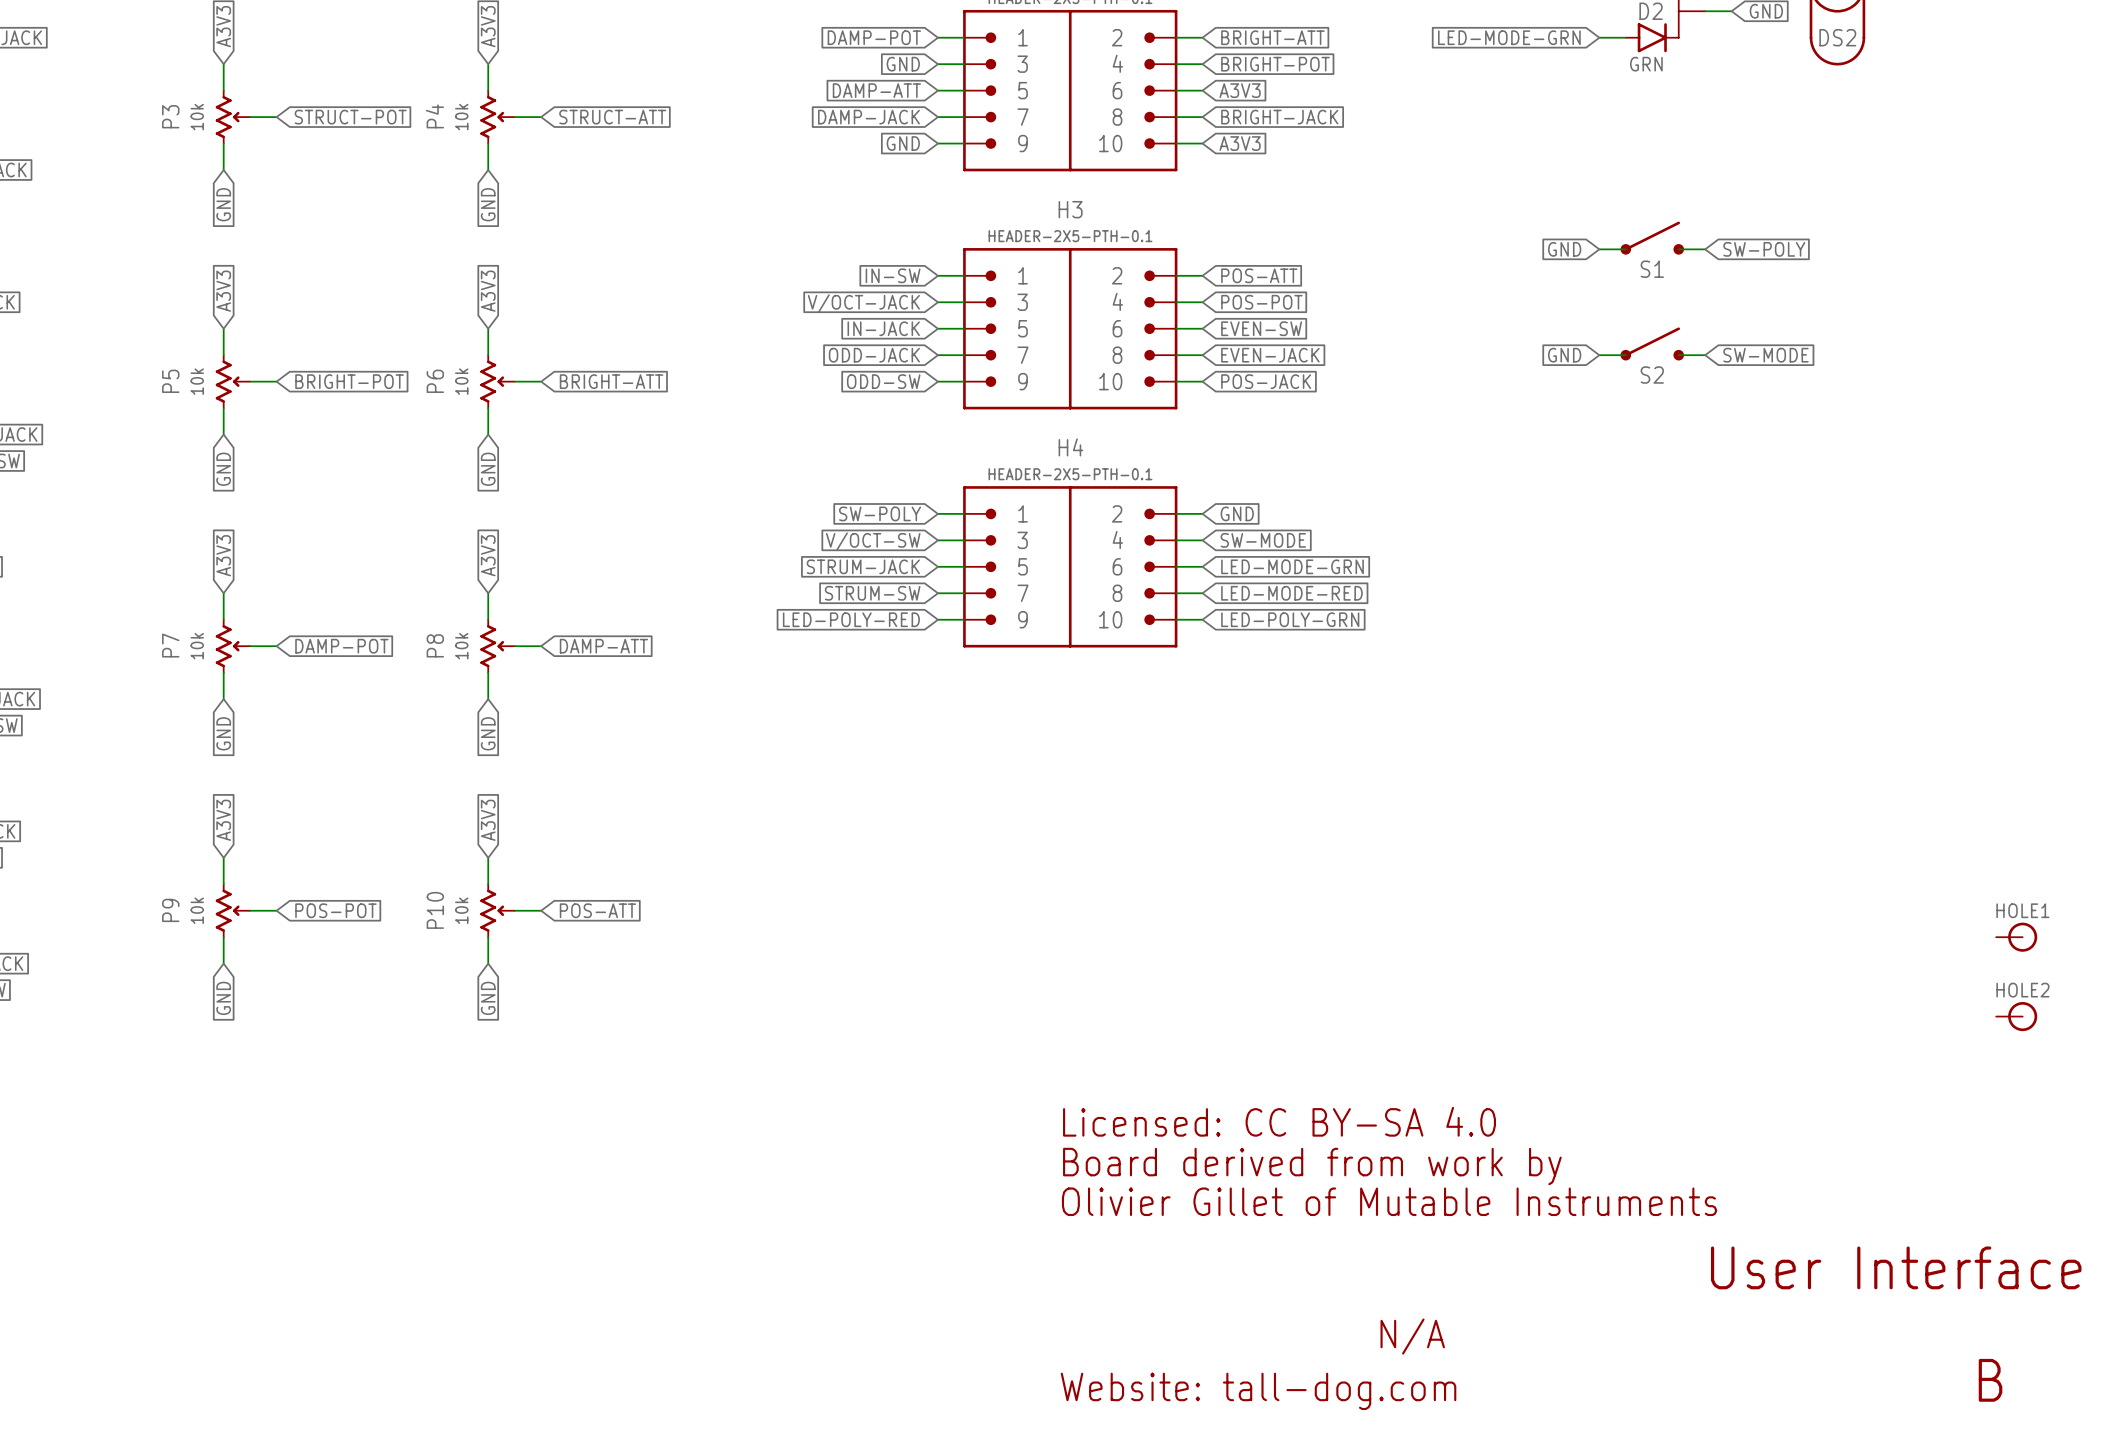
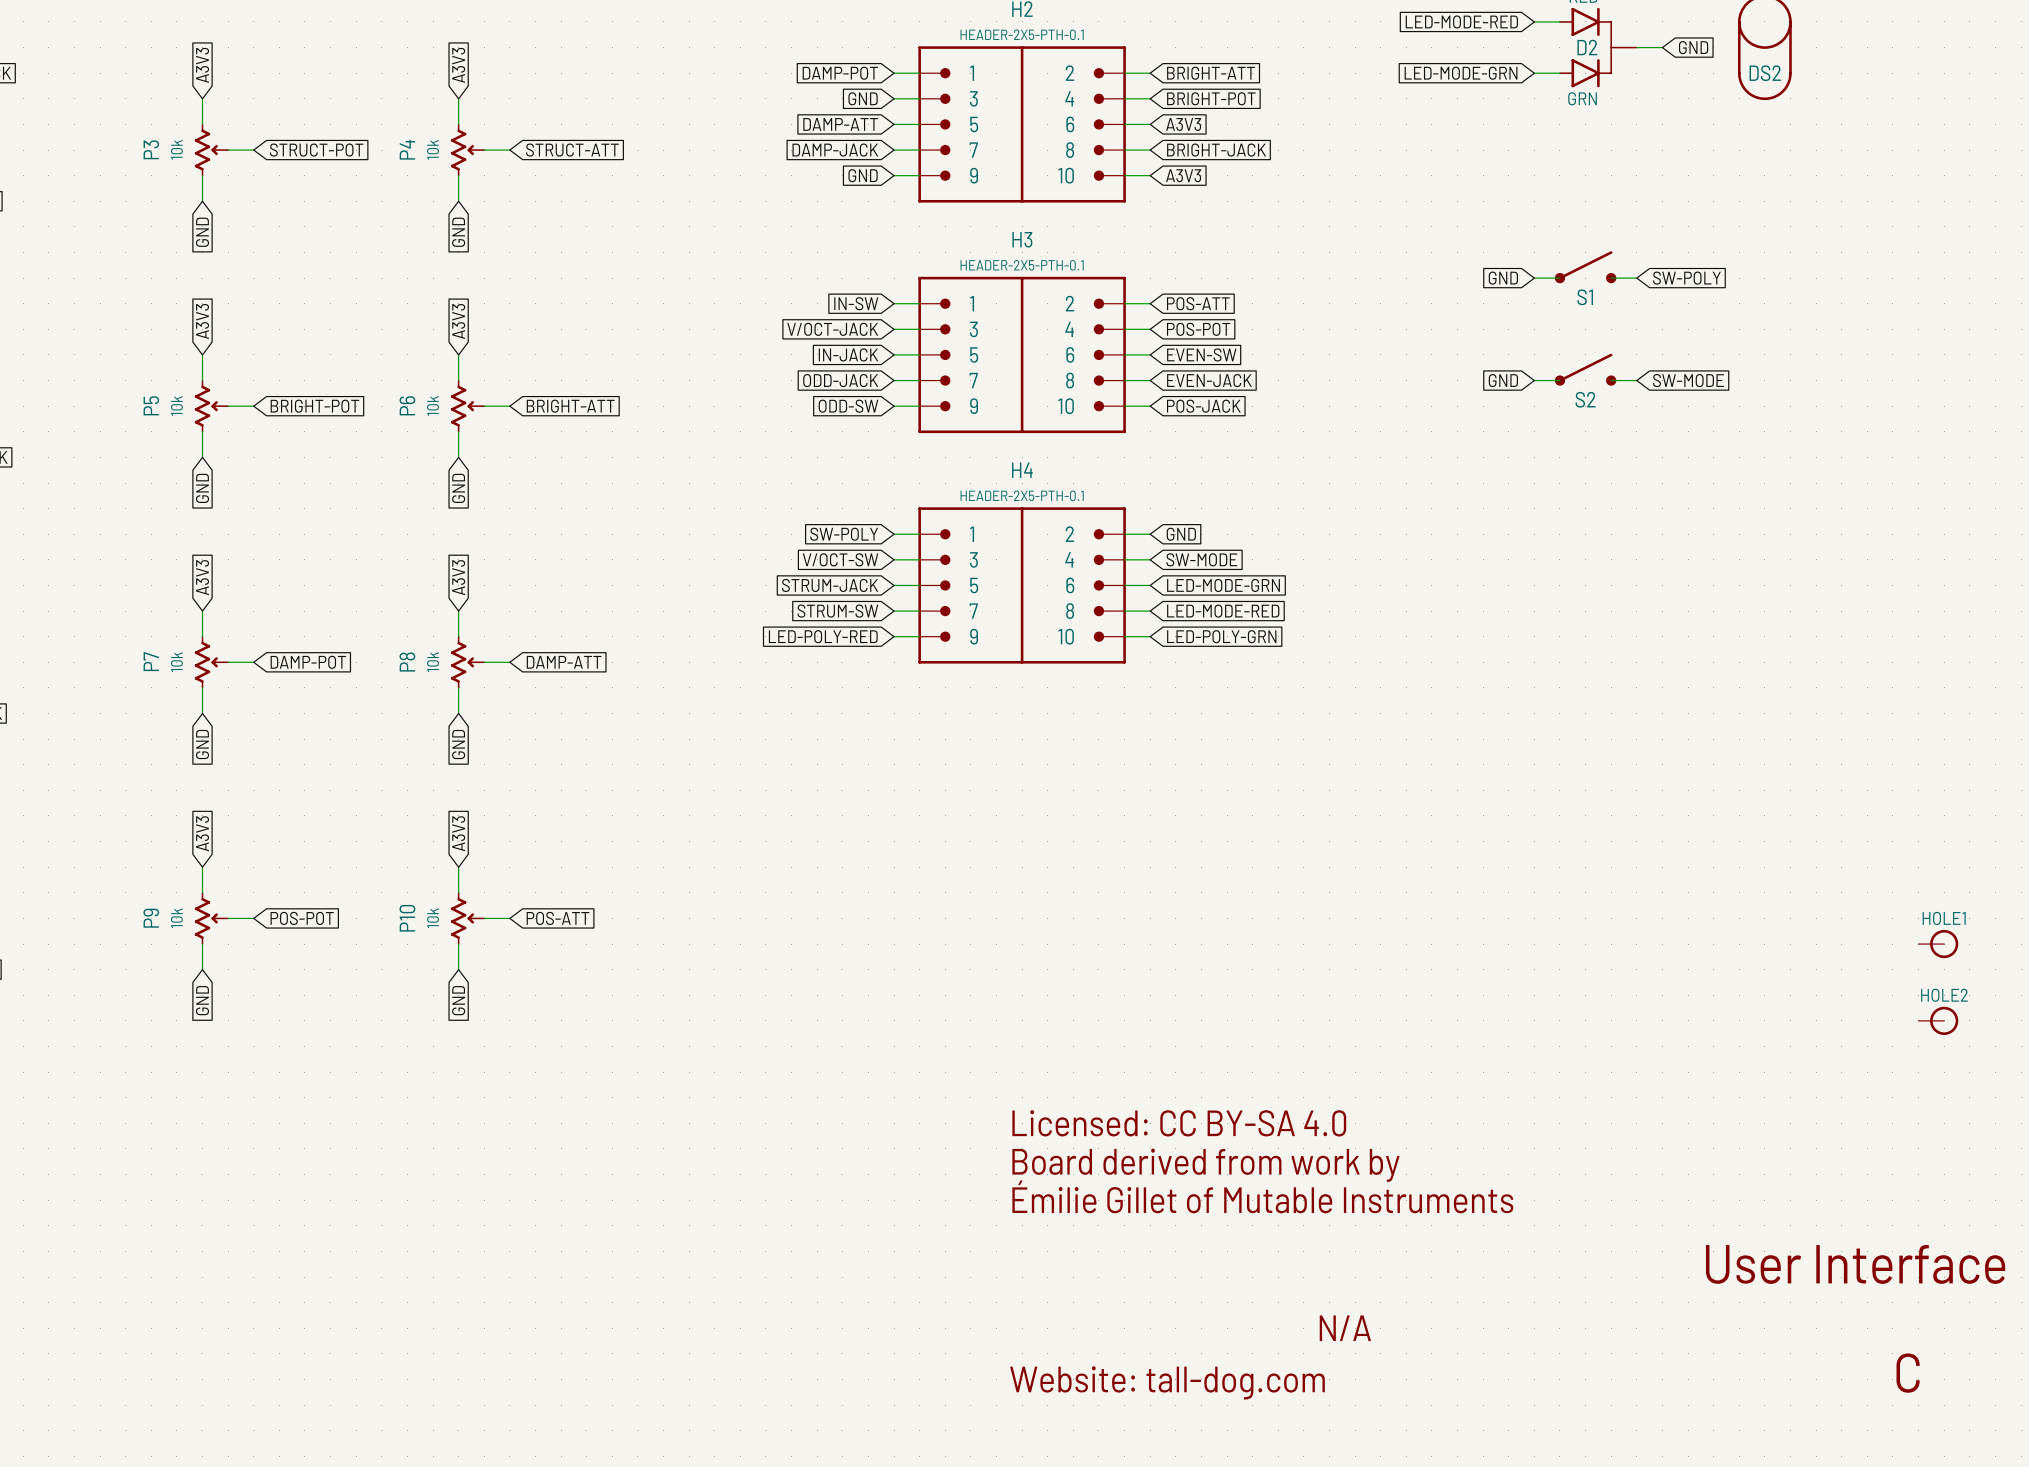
text: Olivier Gillet of Mutable Instruments (1389, 1201) -> Émilie Gillet of Mutable Instruments (1262, 1196)
text: B (1990, 1380) -> C (1908, 1373)

